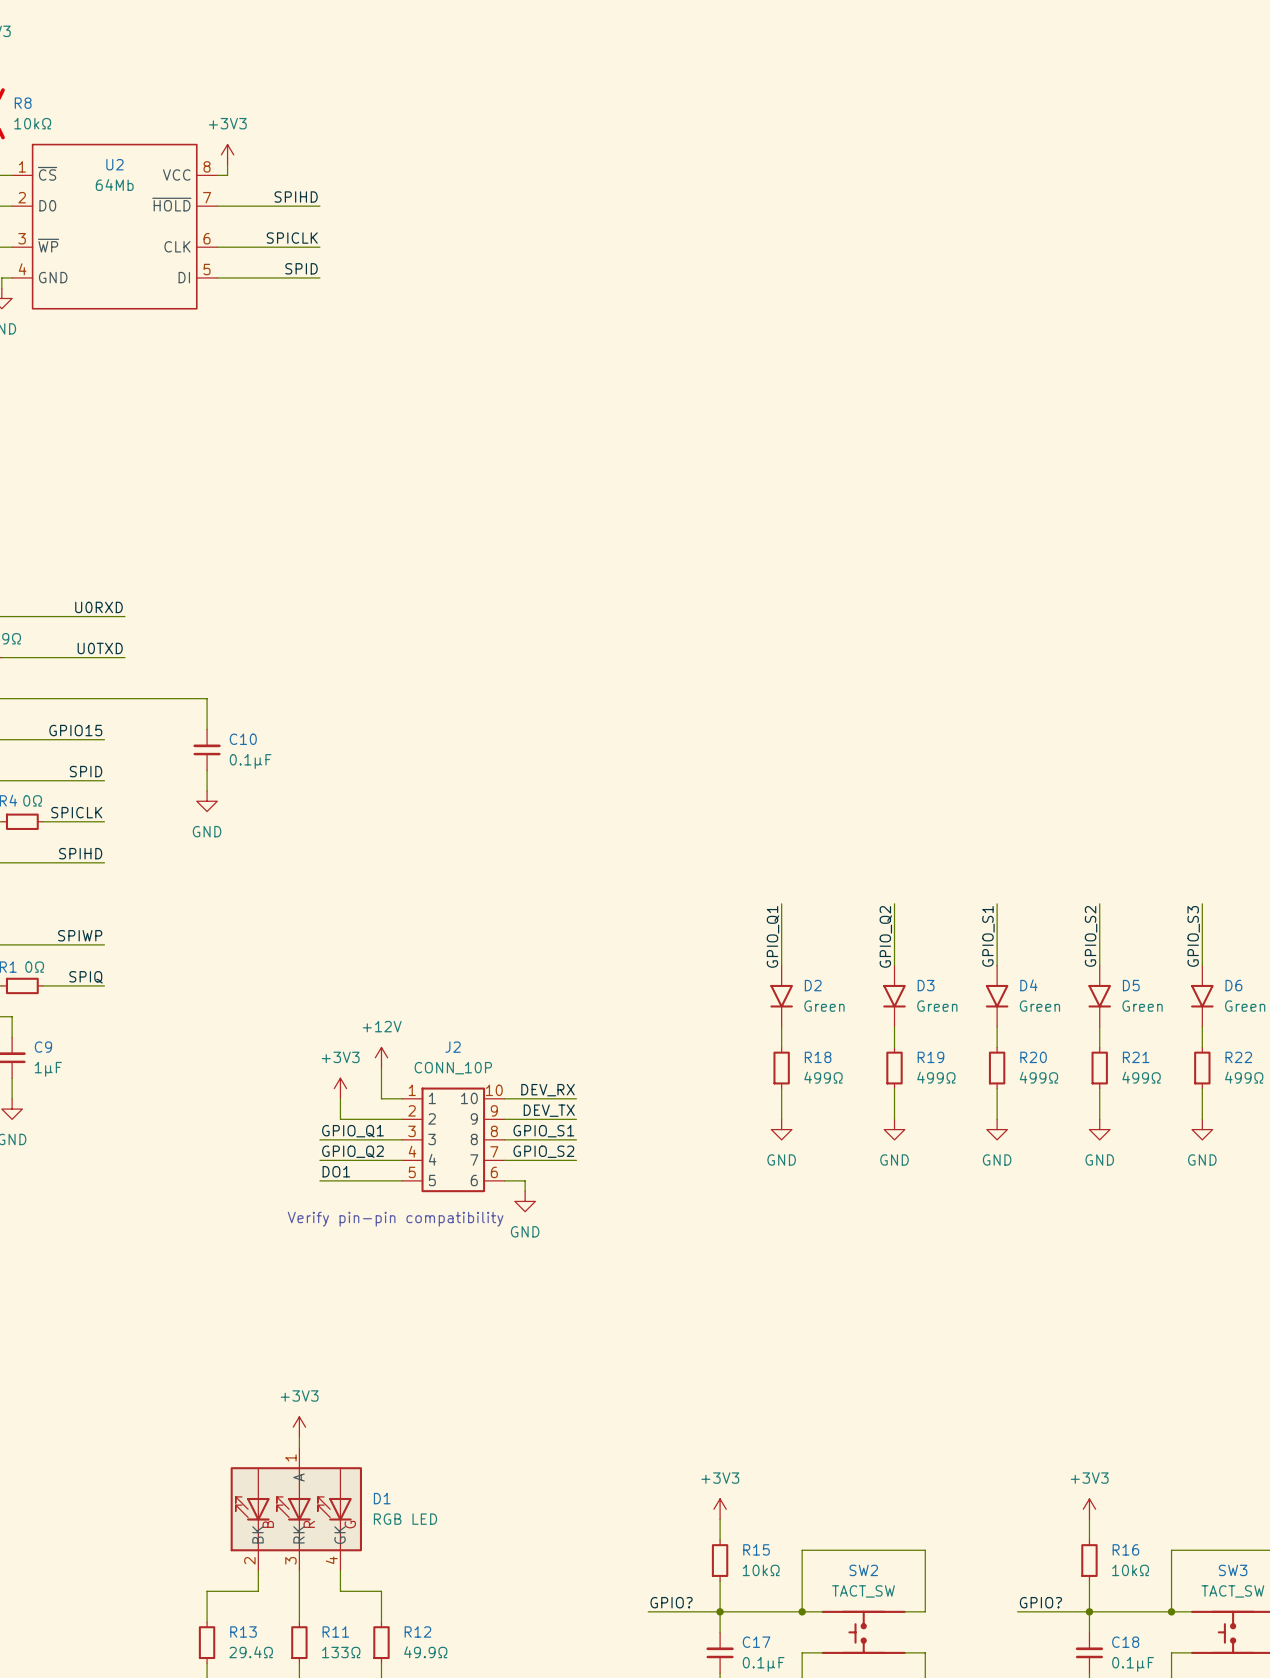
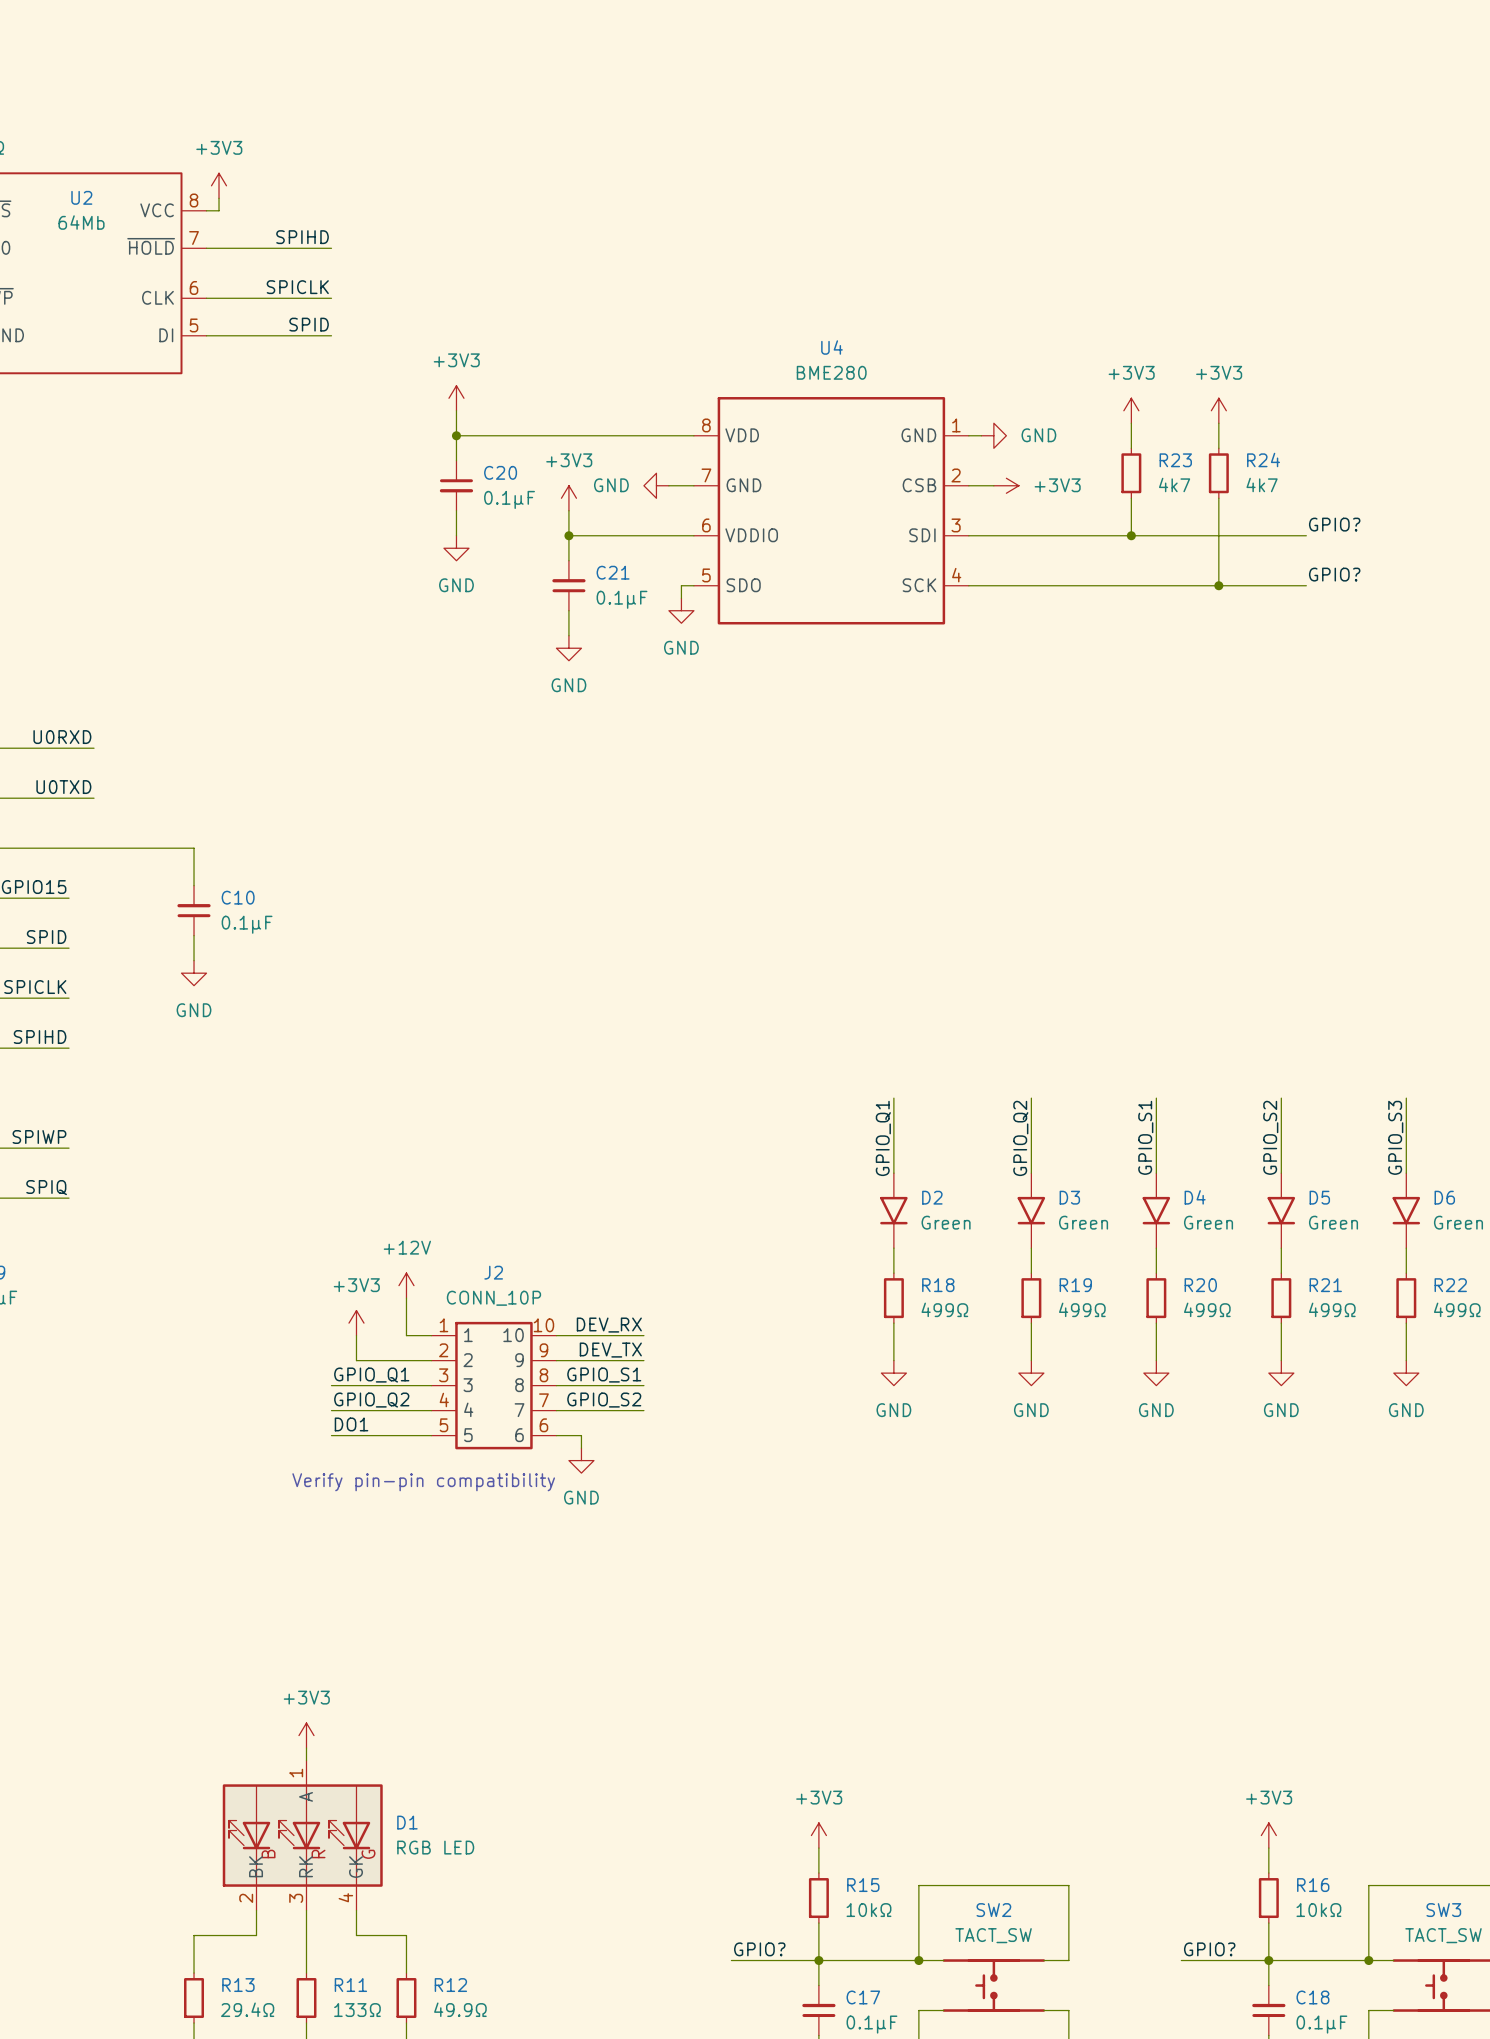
power symbol: none -> +3V3 (456, 398)
wire: none -> (456, 410) (456, 460)
power symbol: none -> +3V3 (1131, 410)
power symbol: none -> +3V3 (1218, 410)
wire: none -> (1131, 423) (1131, 448)
wire: none -> (1218, 423) (1218, 448)
wire: none -> (456, 435) (693, 435)
junction: none -> (456, 435)
wire: none -> (968, 435) (981, 435)
power symbol: none -> GND (993, 435)
R23: none -> (1131, 473)
R24: none -> (1218, 473)
C20: none -> (456, 485)
power symbol: none -> GND (656, 485)
wire: none -> (668, 485) (693, 485)
wire: none -> (968, 485) (993, 485)
power symbol: none -> +3V3 (1006, 485)
power symbol: none -> +3V3 (568, 498)
wire: none -> (1131, 498) (1131, 535)
wire: none -> (1218, 498) (1218, 585)
wire: none -> (456, 510) (456, 535)
wire: none -> (568, 510) (568, 560)
U4: none -> (831, 510)
label: none -> GPIO? (1334, 524)
wire: none -> (568, 535) (693, 535)
junction: none -> (568, 535)
wire: none -> (968, 535) (1306, 535)
junction: none -> (1131, 535)
power symbol: none -> GND (456, 548)
label: none -> GPIO? (1334, 574)
C21: none -> (568, 585)
wire: none -> (693, 585) (681, 585) (681, 598)
wire: none -> (968, 585) (1306, 585)
junction: none -> (1218, 585)
wire: none -> (568, 610) (568, 635)
power symbol: none -> GND (681, 610)
power symbol: none -> GND (568, 648)

